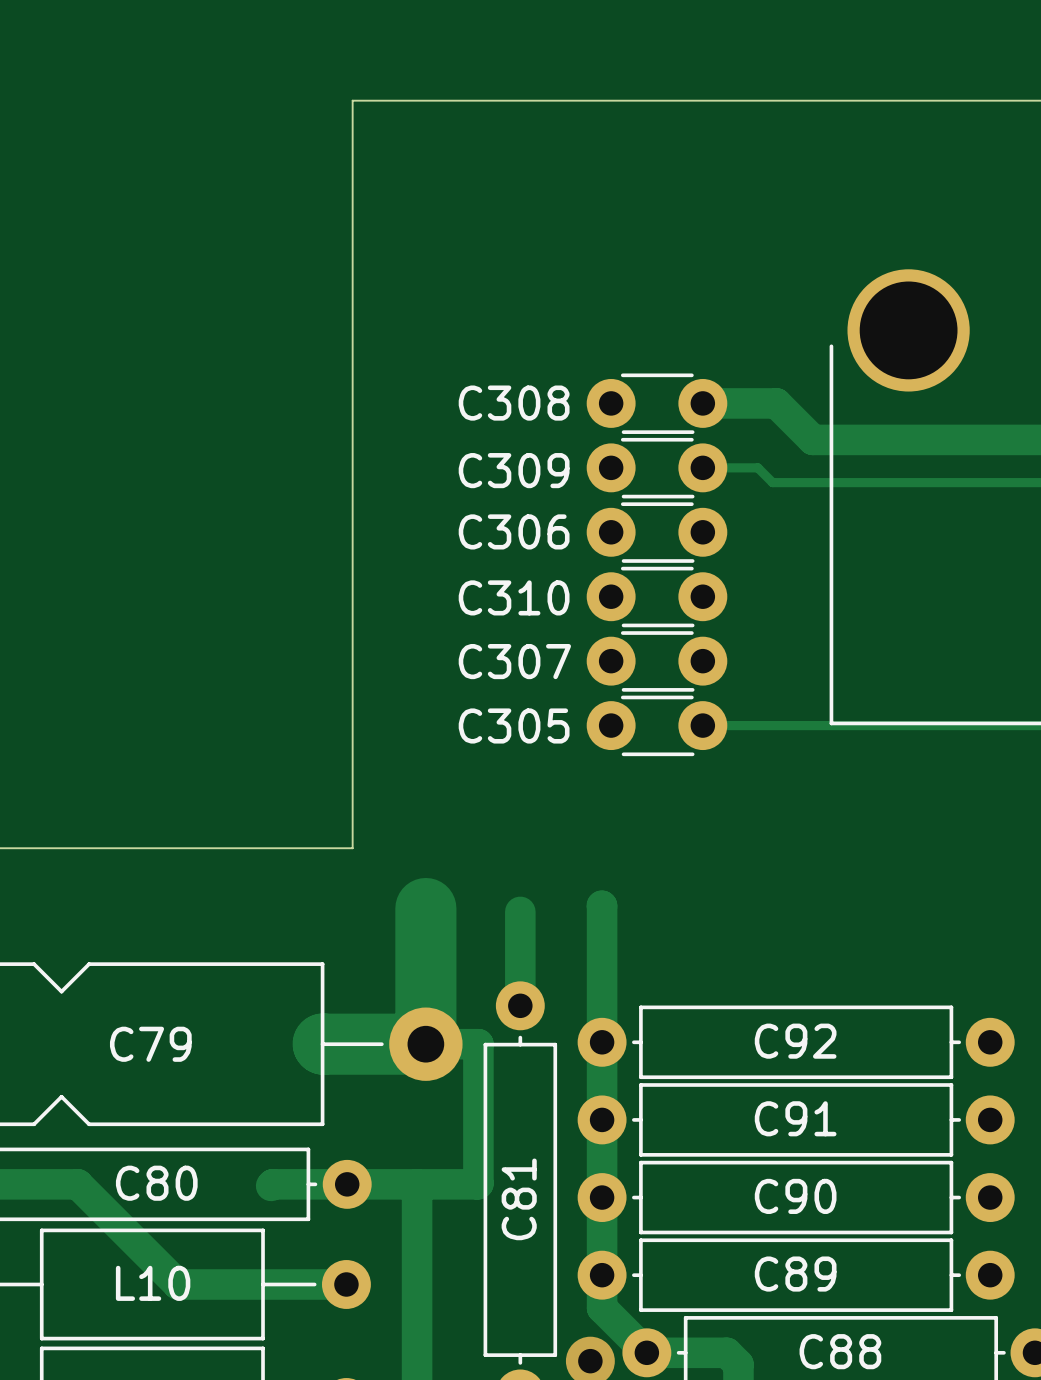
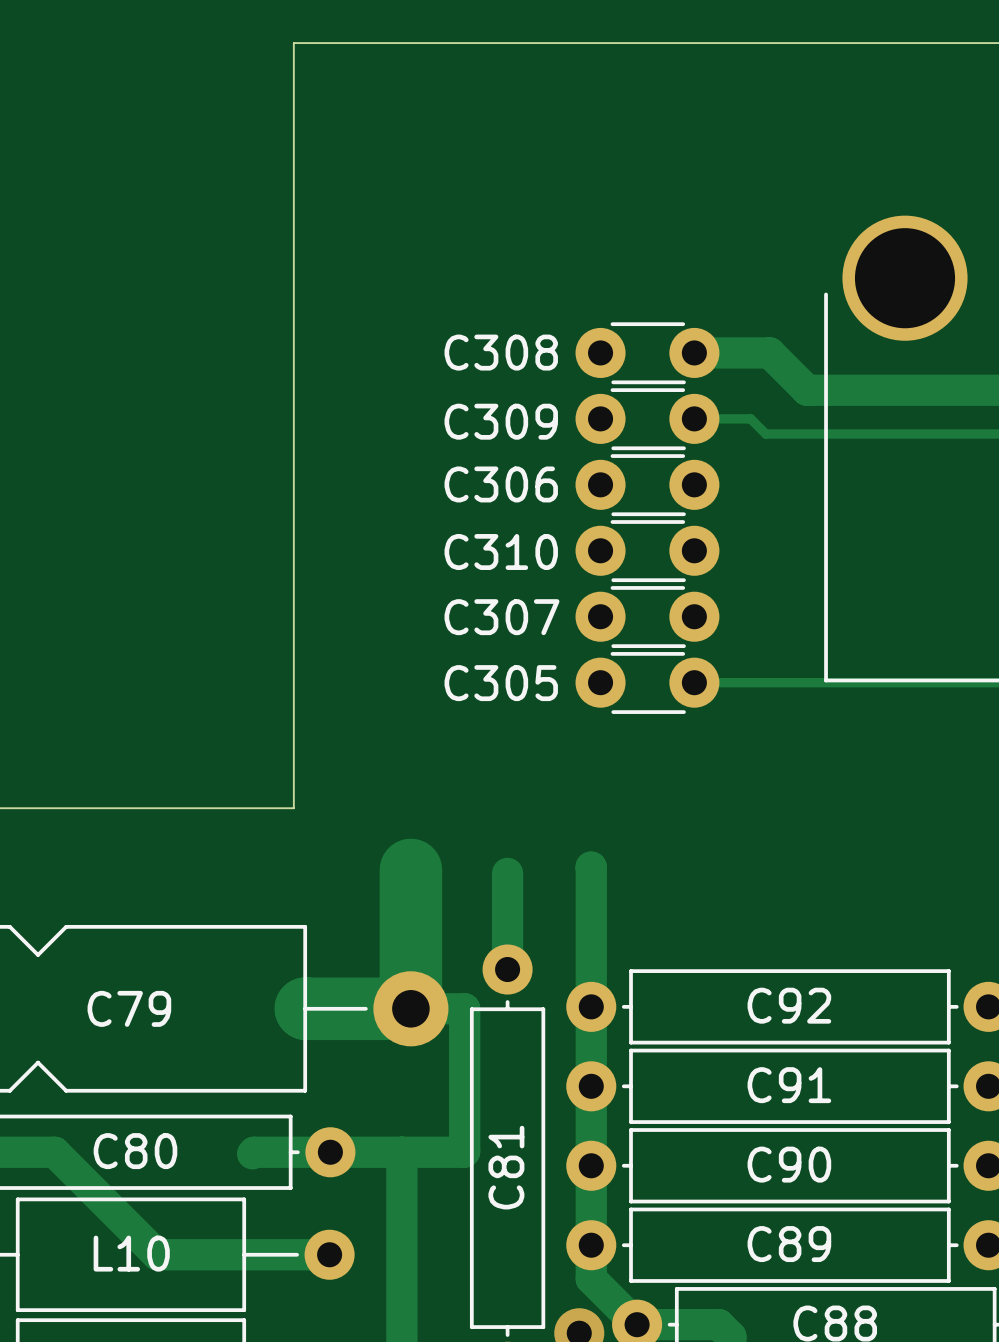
board edge: (352, 100) (352, 848) (311, 848) -> (335, 43) (293, 43) (293, 808)

